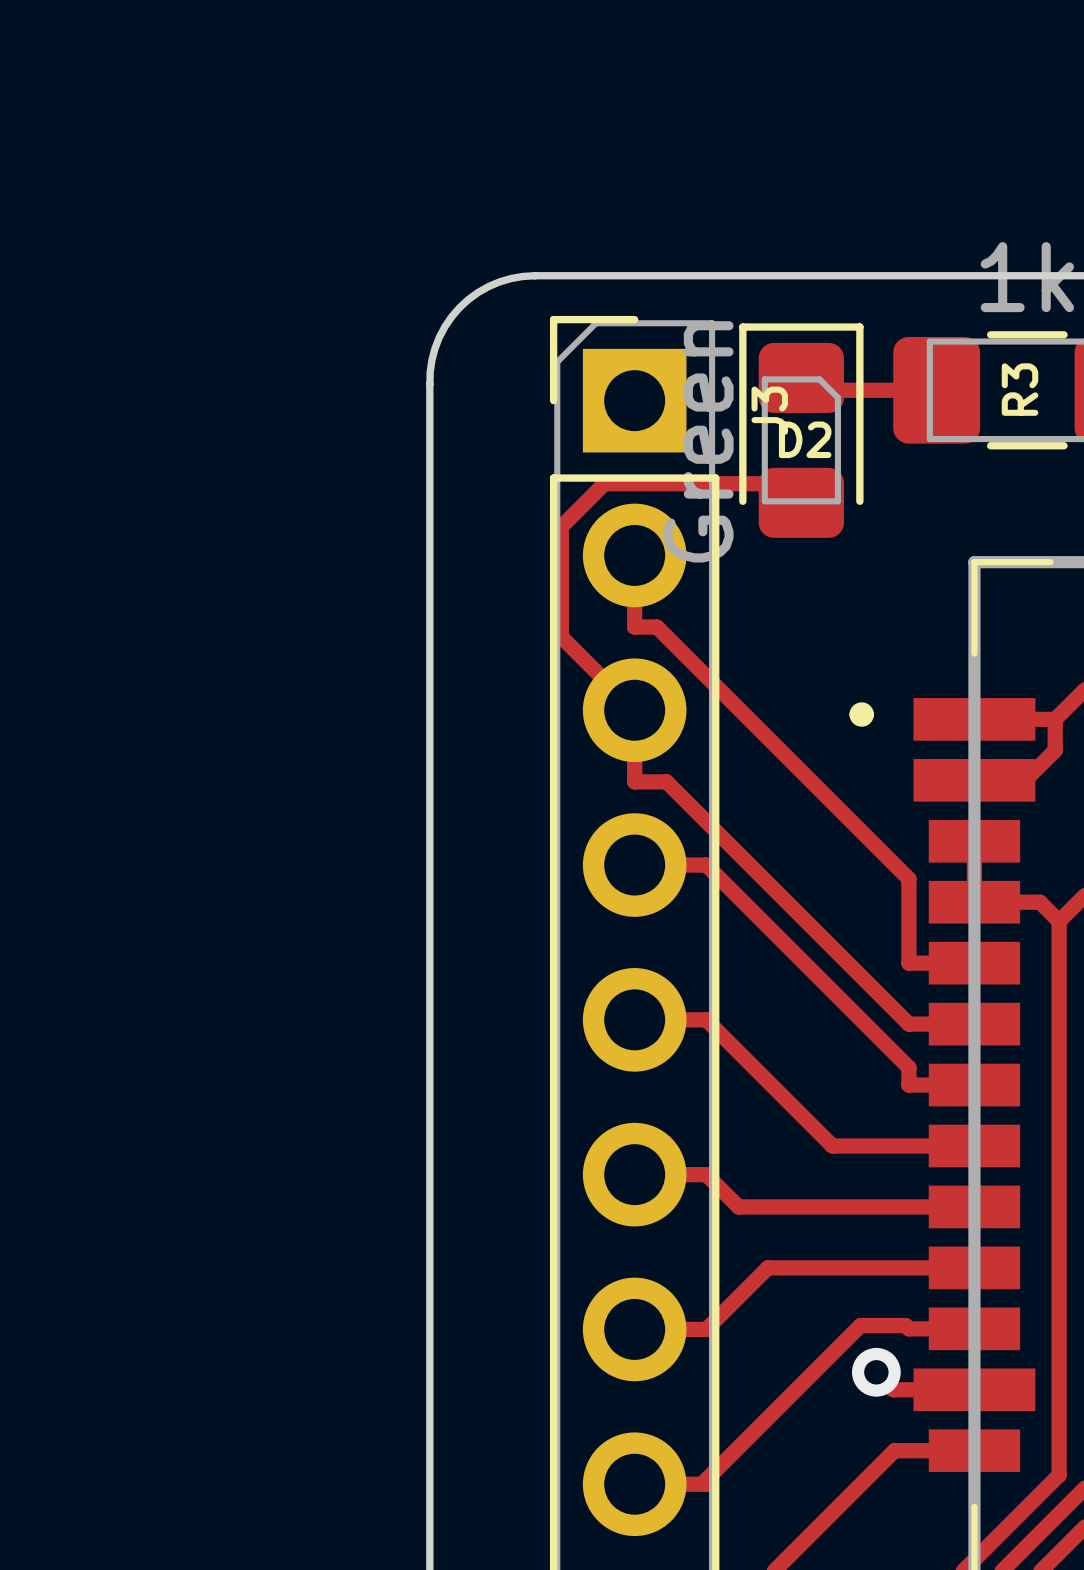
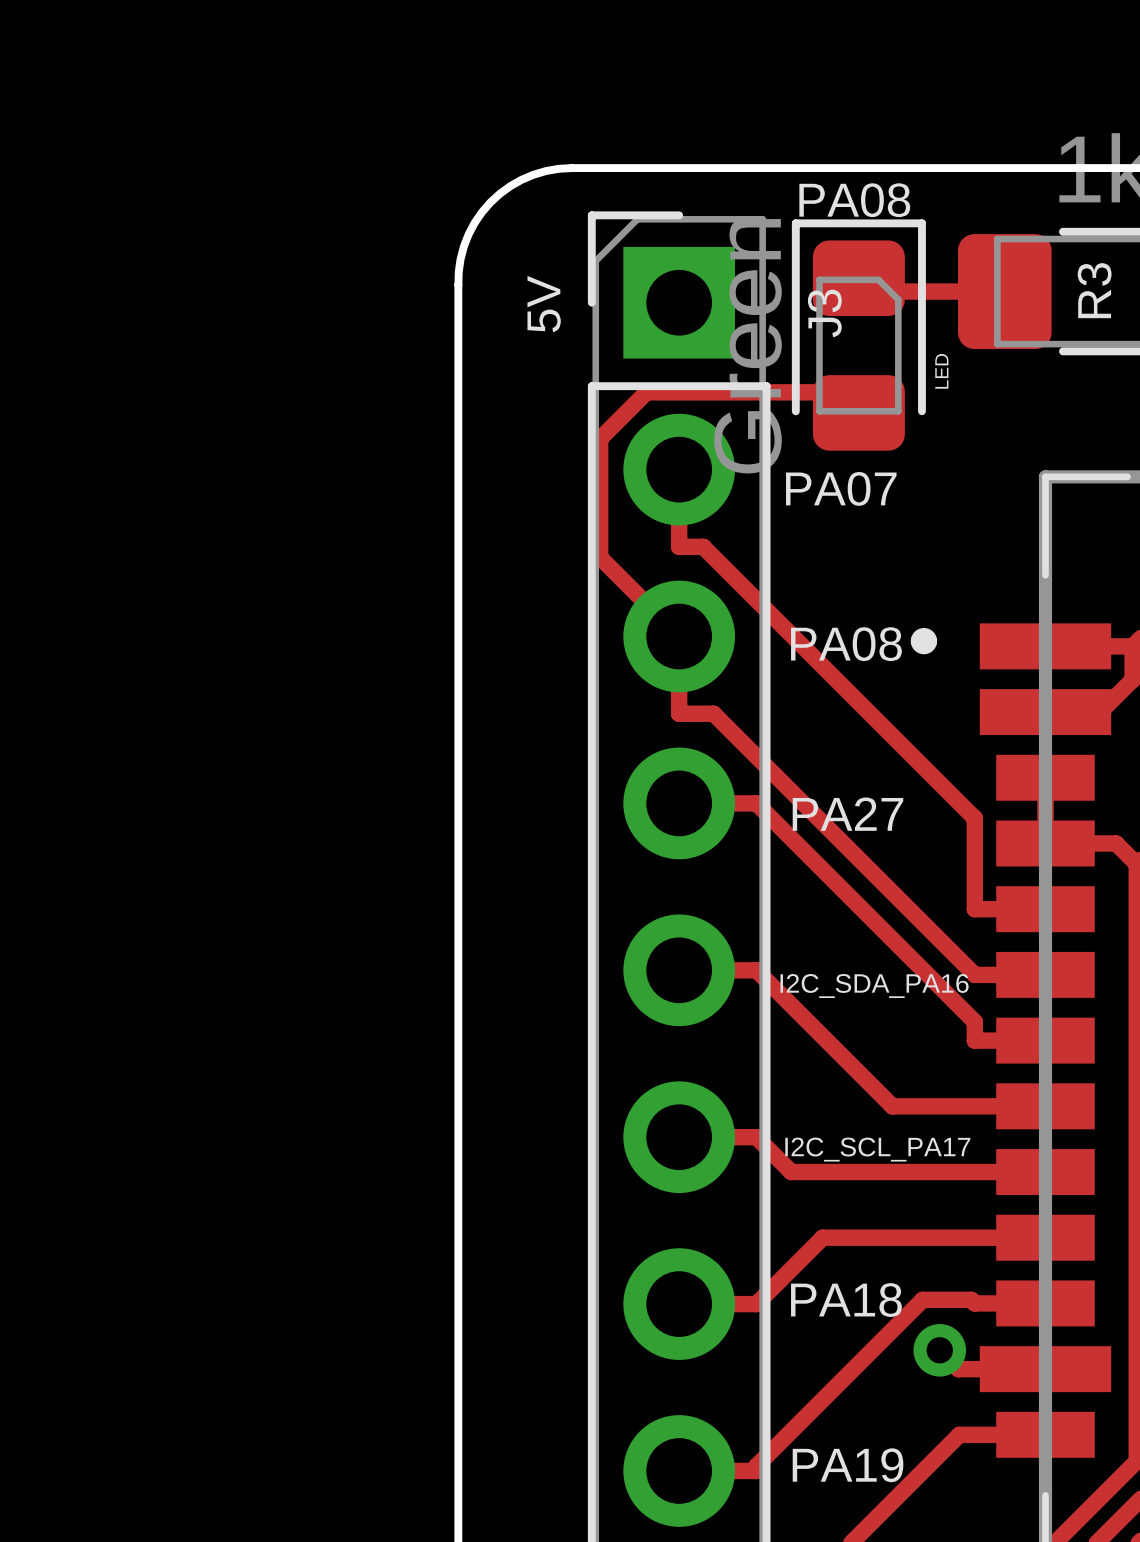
text: none -> 5V (544, 304)
D2 name: D2 (805, 439) -> PA08 (854, 200)
text: none -> LED (941, 371)
text: none -> PA07 (841, 488)
text: none -> PA08 (846, 644)
text: none -> PA27 (847, 814)
text: none -> I2C_SDA_PA16 (874, 986)
text: none -> I2C_SCL_PA17 (877, 1149)
text: none -> PA18 (846, 1300)
text: none -> PA19 (848, 1465)

